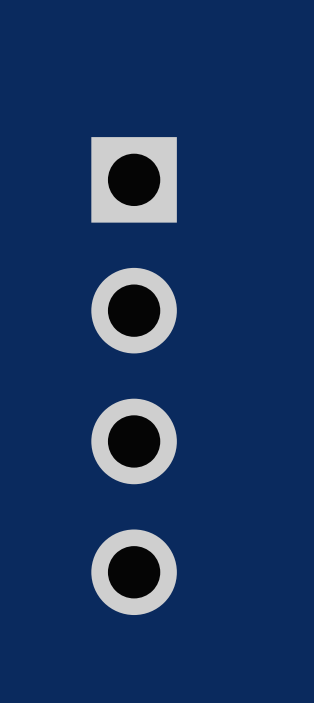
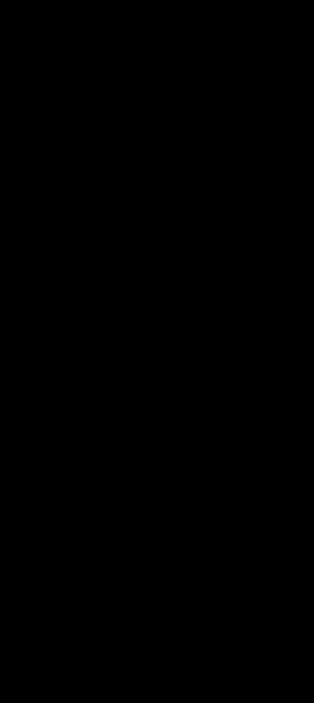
part: (134, 376) -> none

